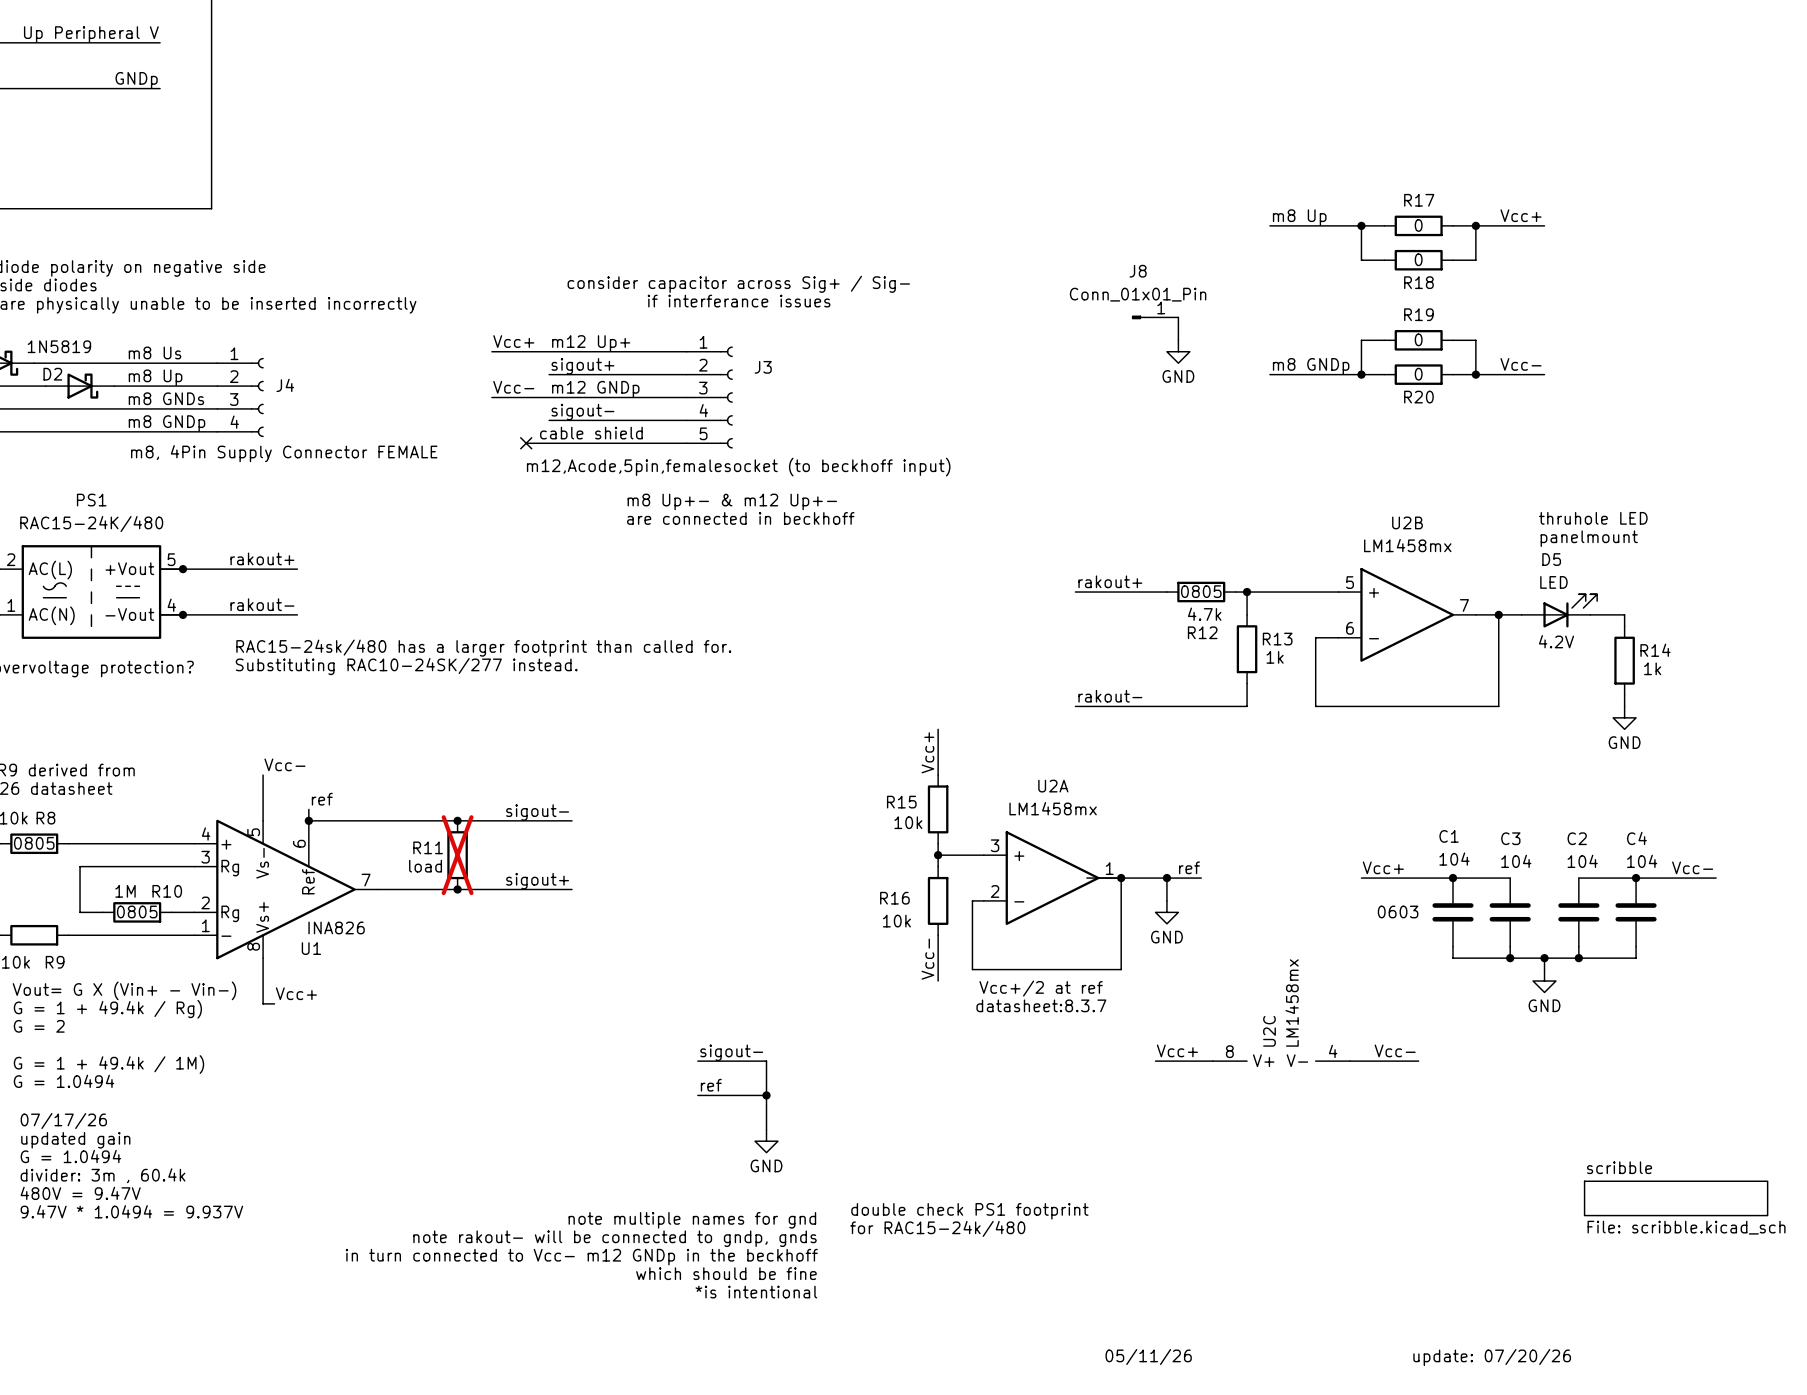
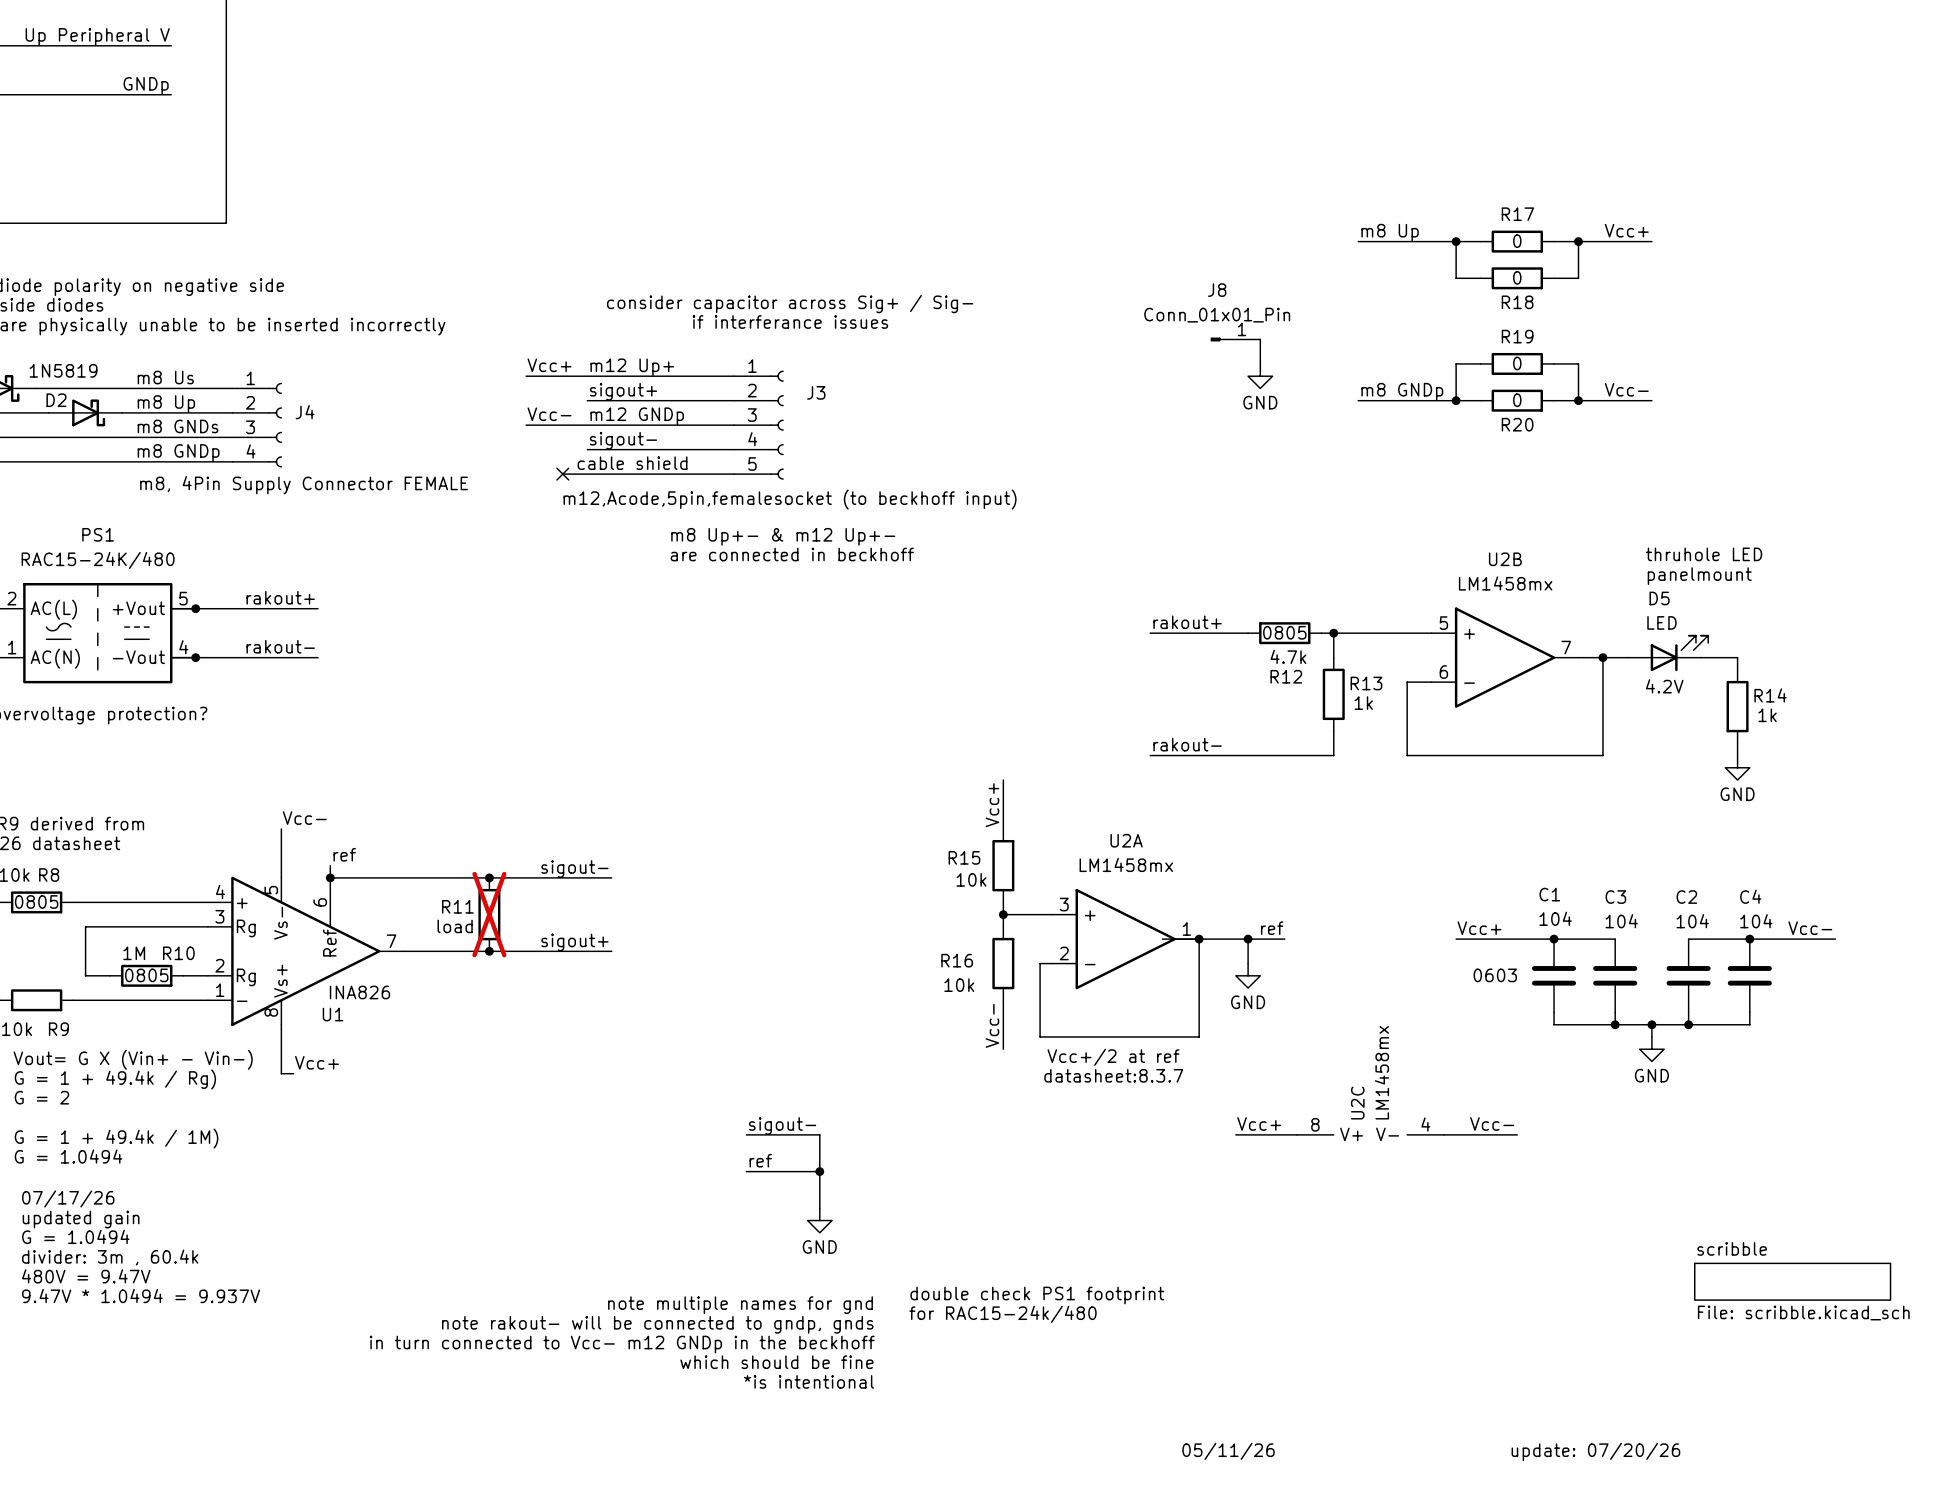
text: RAC15-24sk/480 has a larger footprint than called for. (483, 648) -> none
text: Substituting RAC10-24SK/277 instead. (406, 666) -> none

